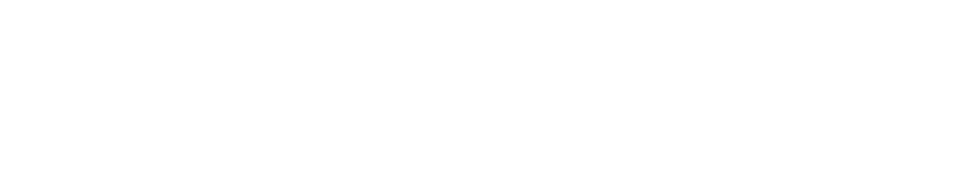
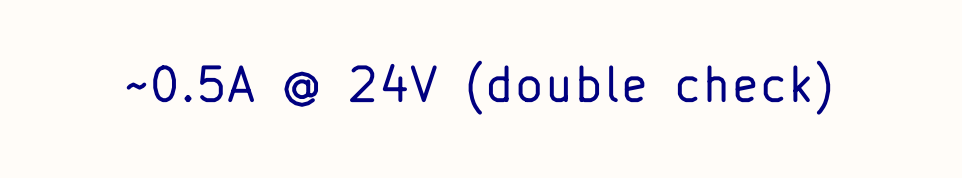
text: none -> ~0.5A @ 24V (double check) (478, 87)

